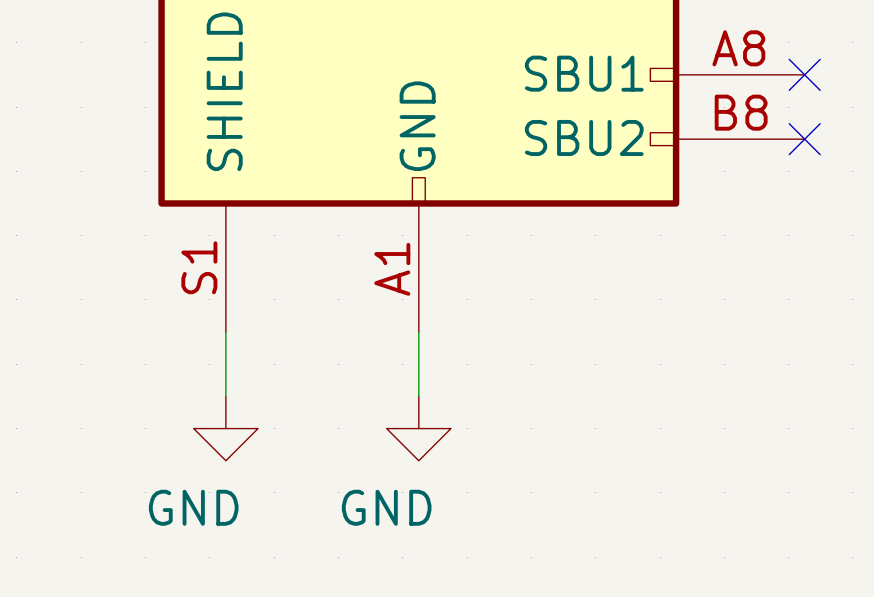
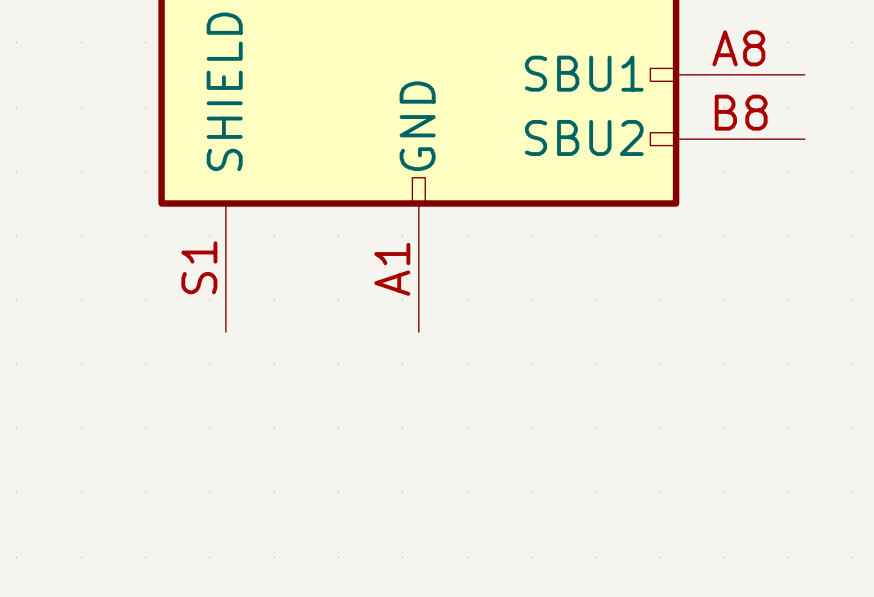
no-connect mark: (804, 74) -> none
no-connect mark: (804, 139) -> none
wire: (225, 332) (225, 396) -> none
wire: (418, 332) (418, 396) -> none
power symbol: GND (225, 428) -> none
power symbol: GND (418, 428) -> none

